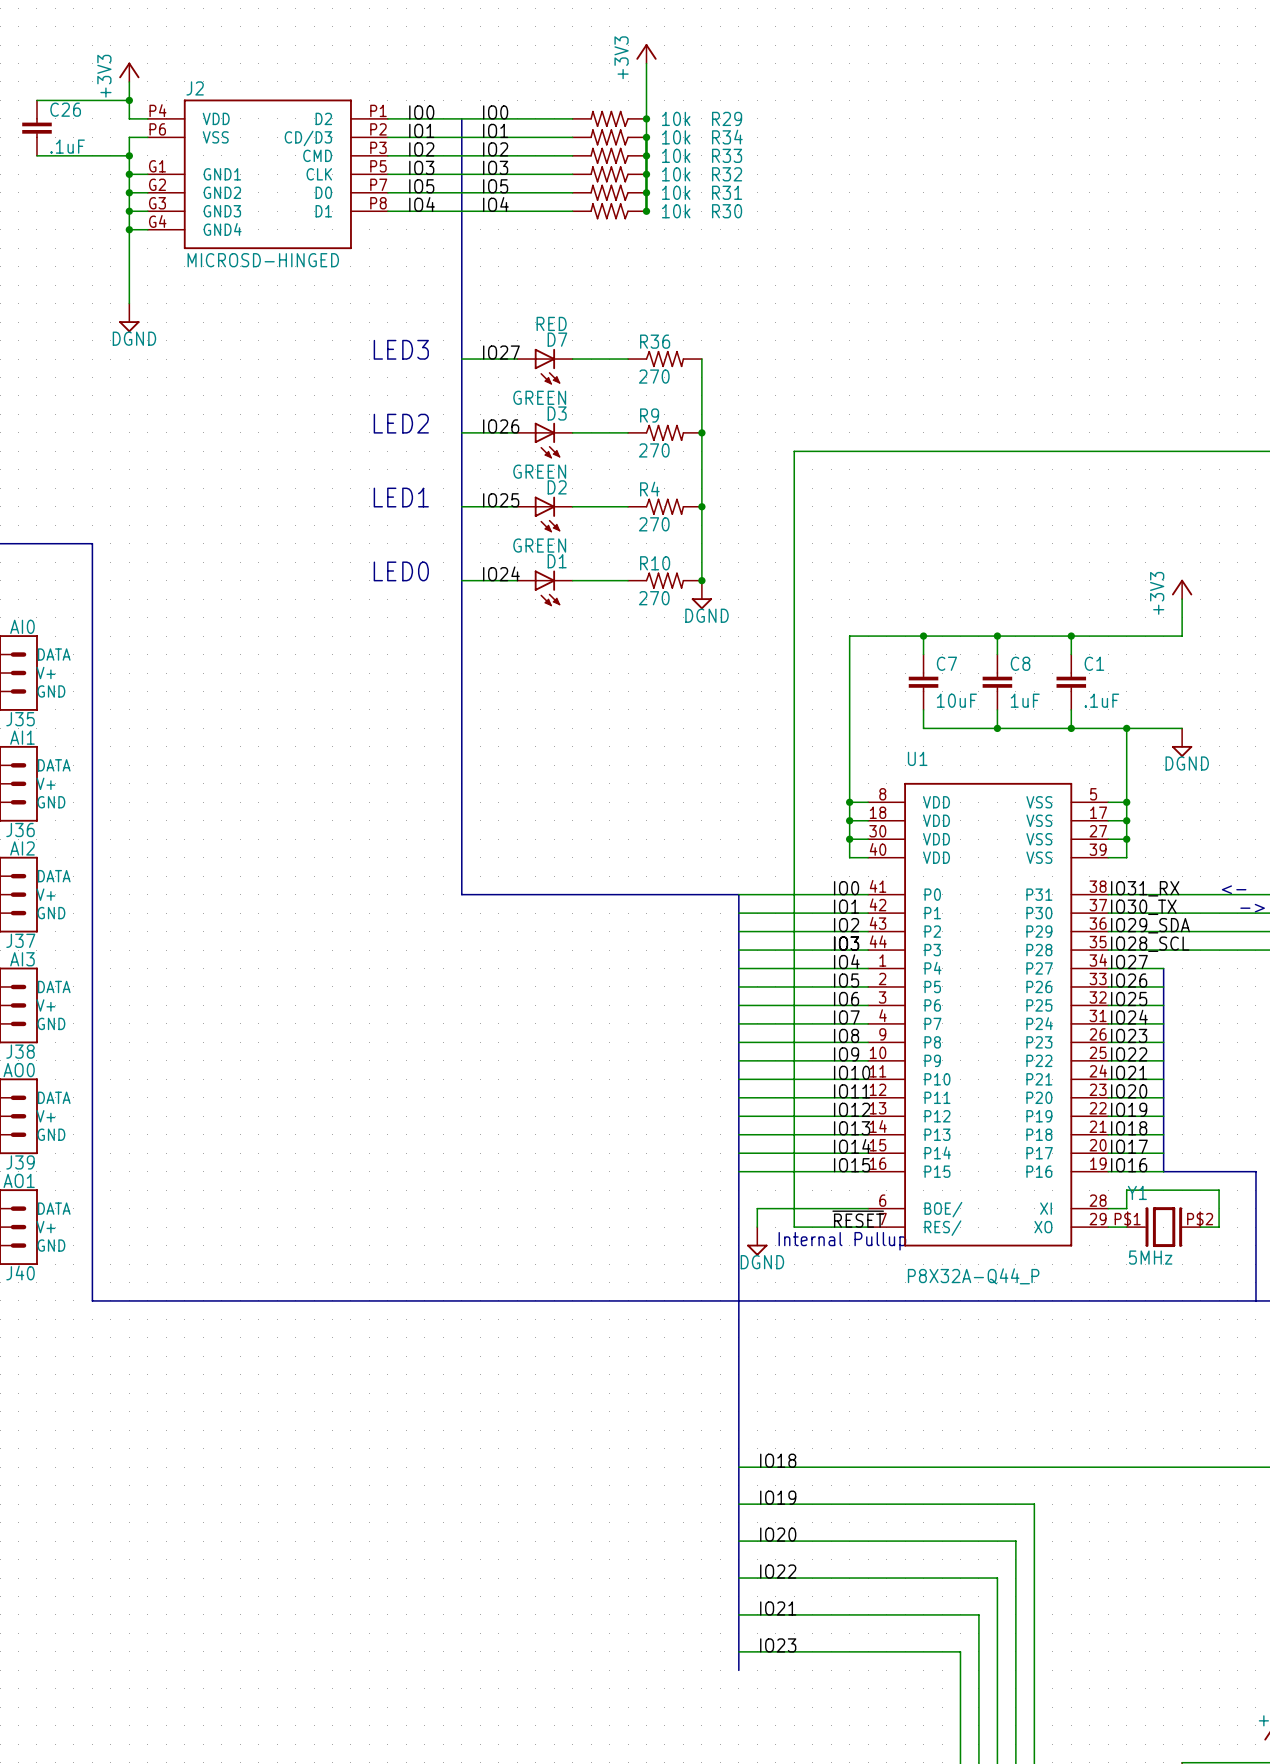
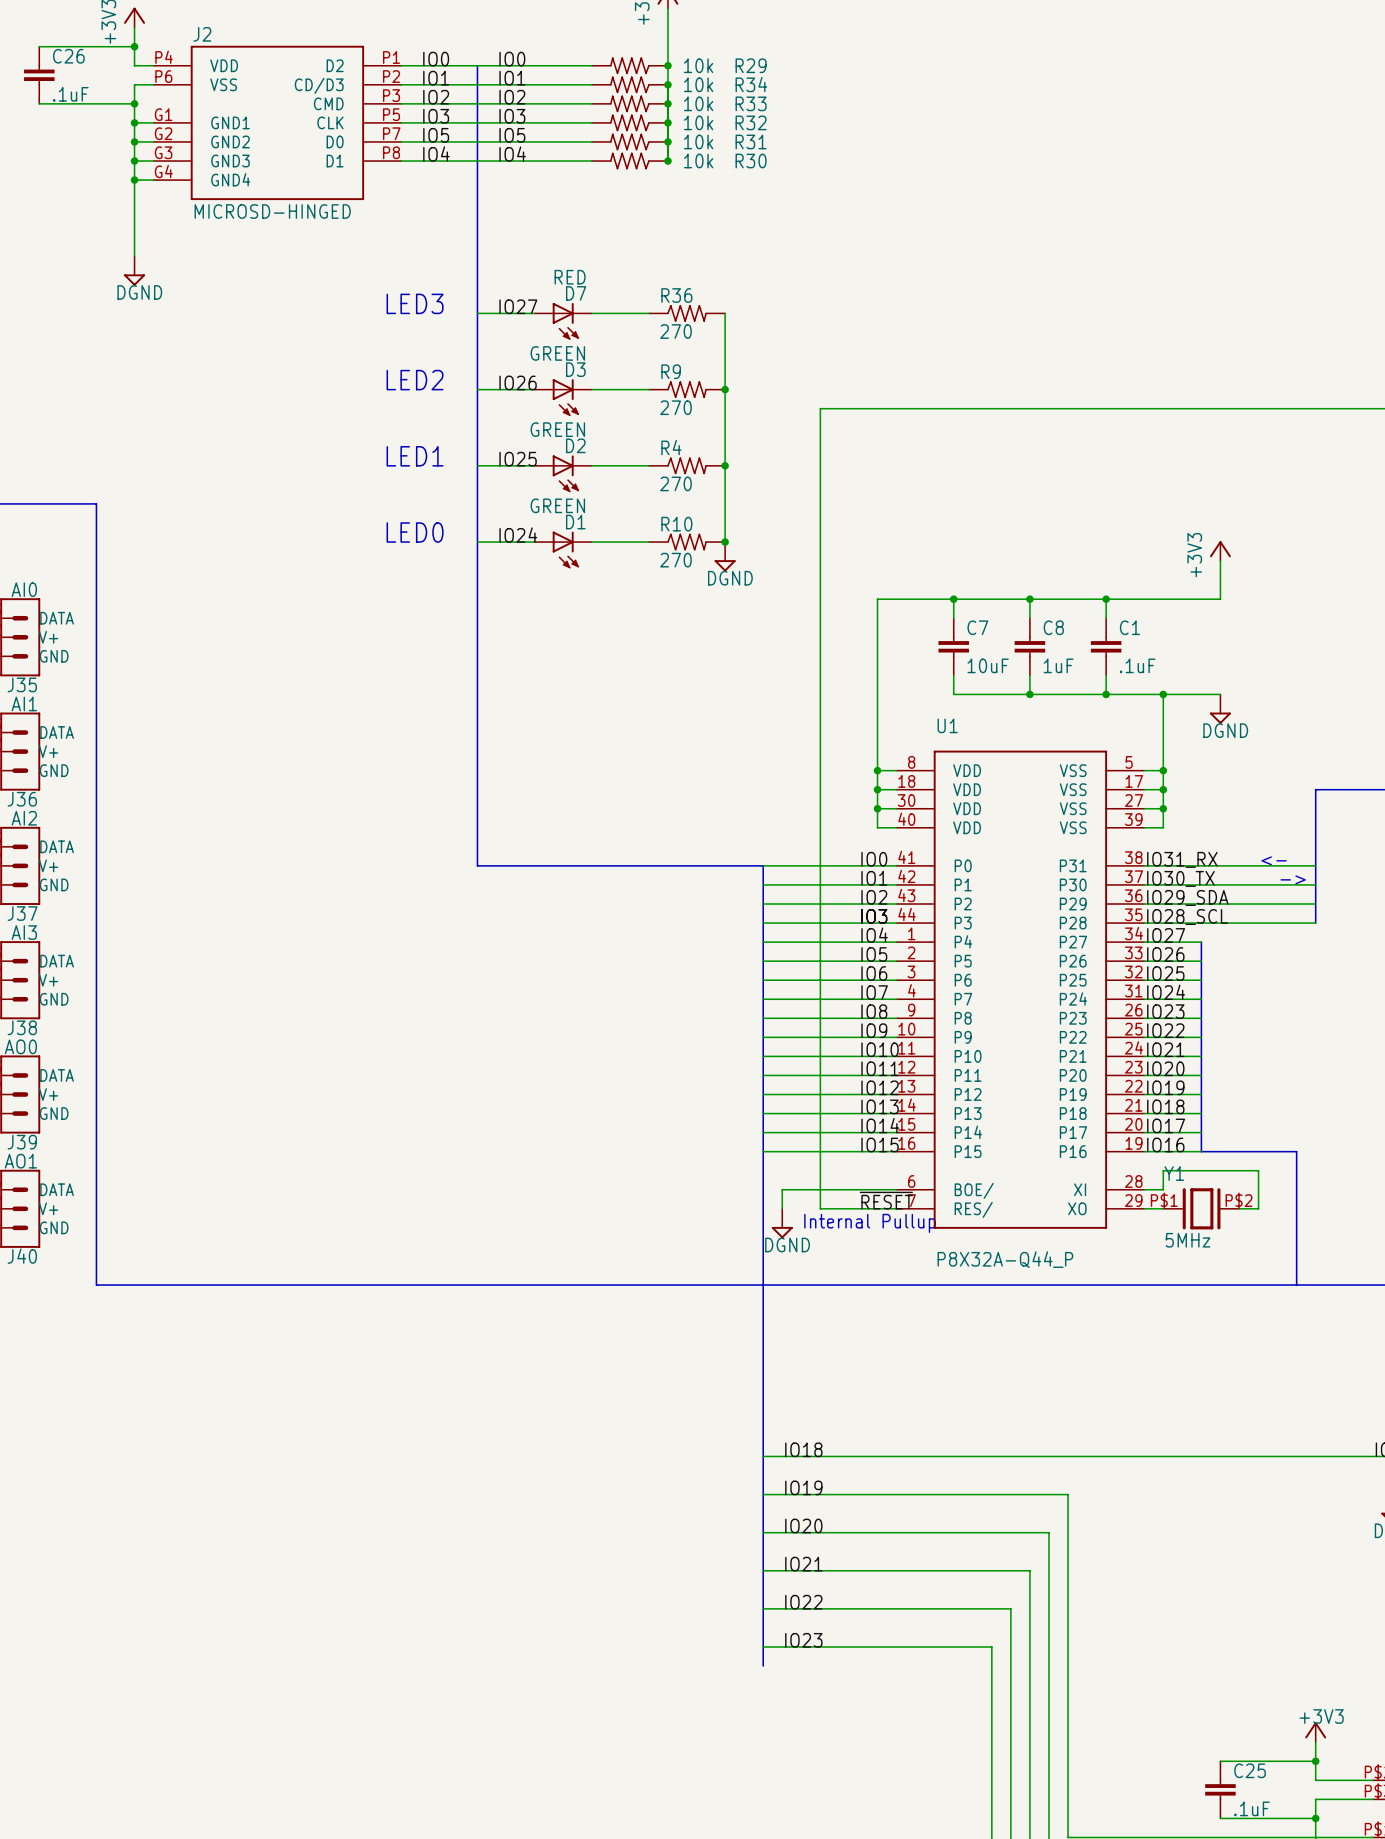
label: IO22 (778, 1571) -> IO21 (803, 1564)
label: IO21 (778, 1608) -> IO22 (803, 1602)

